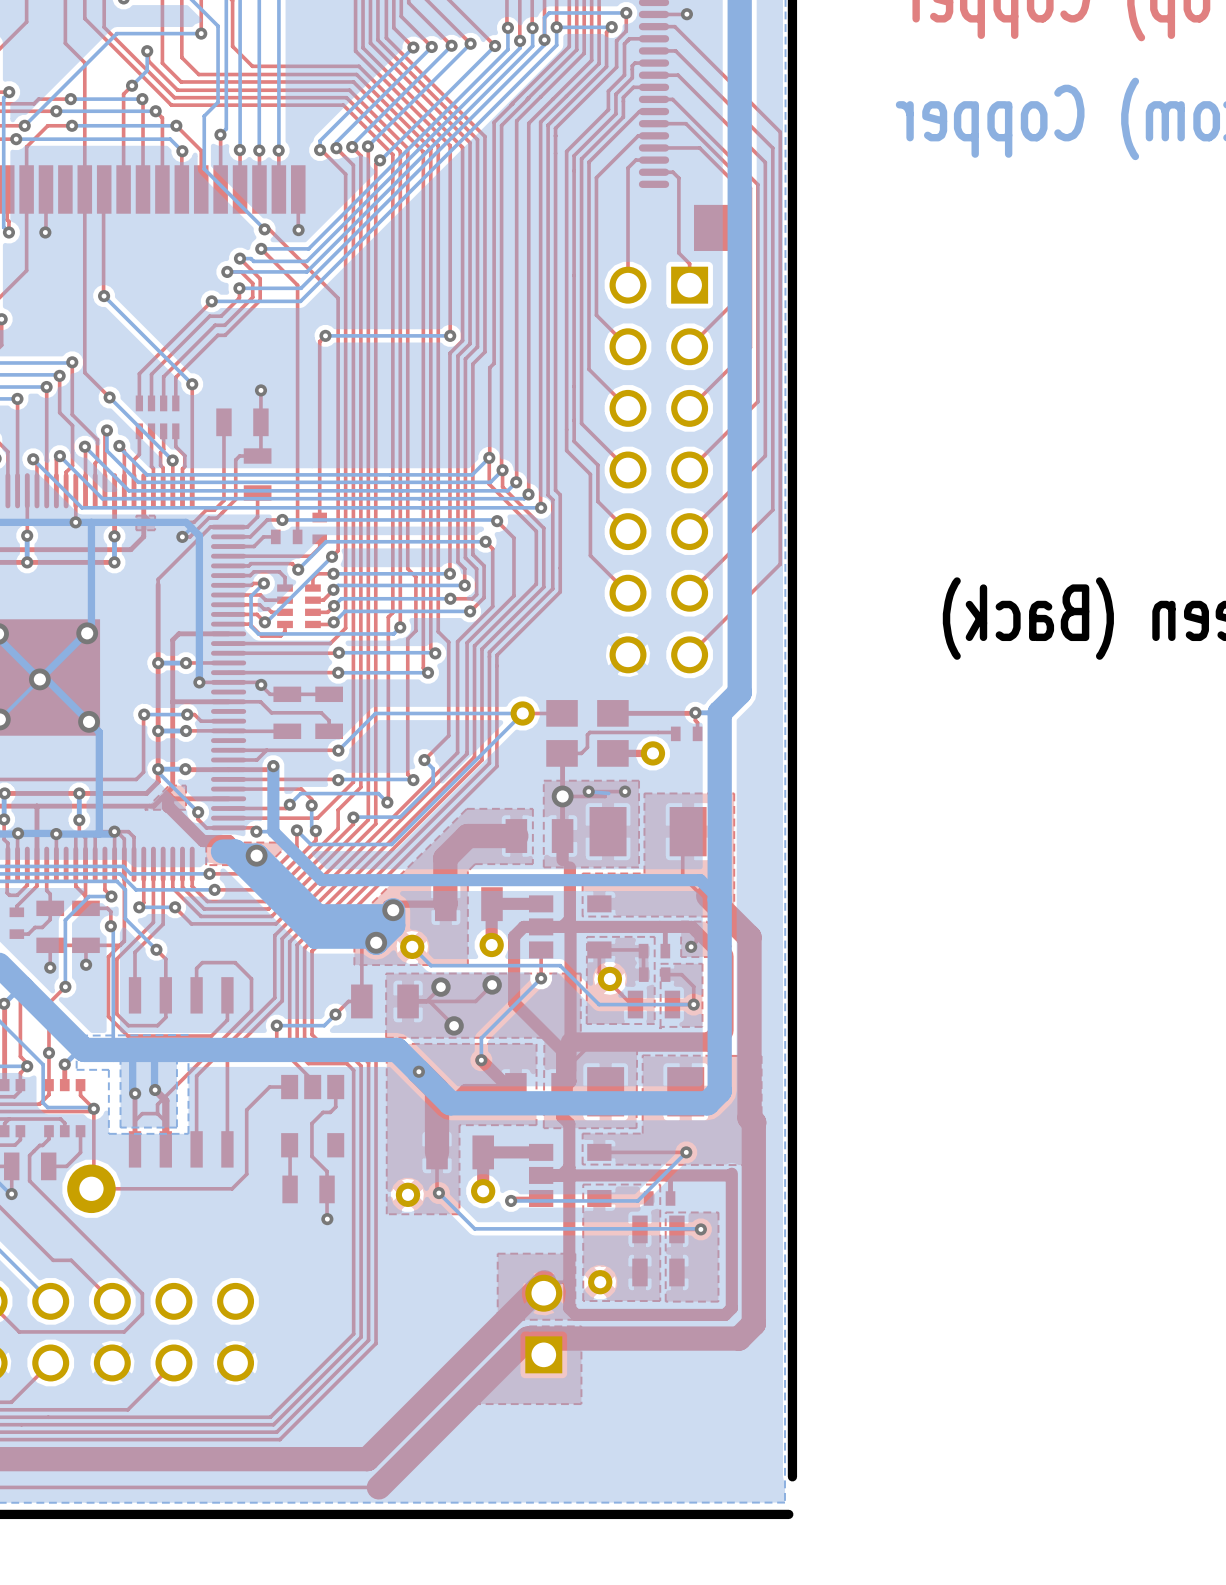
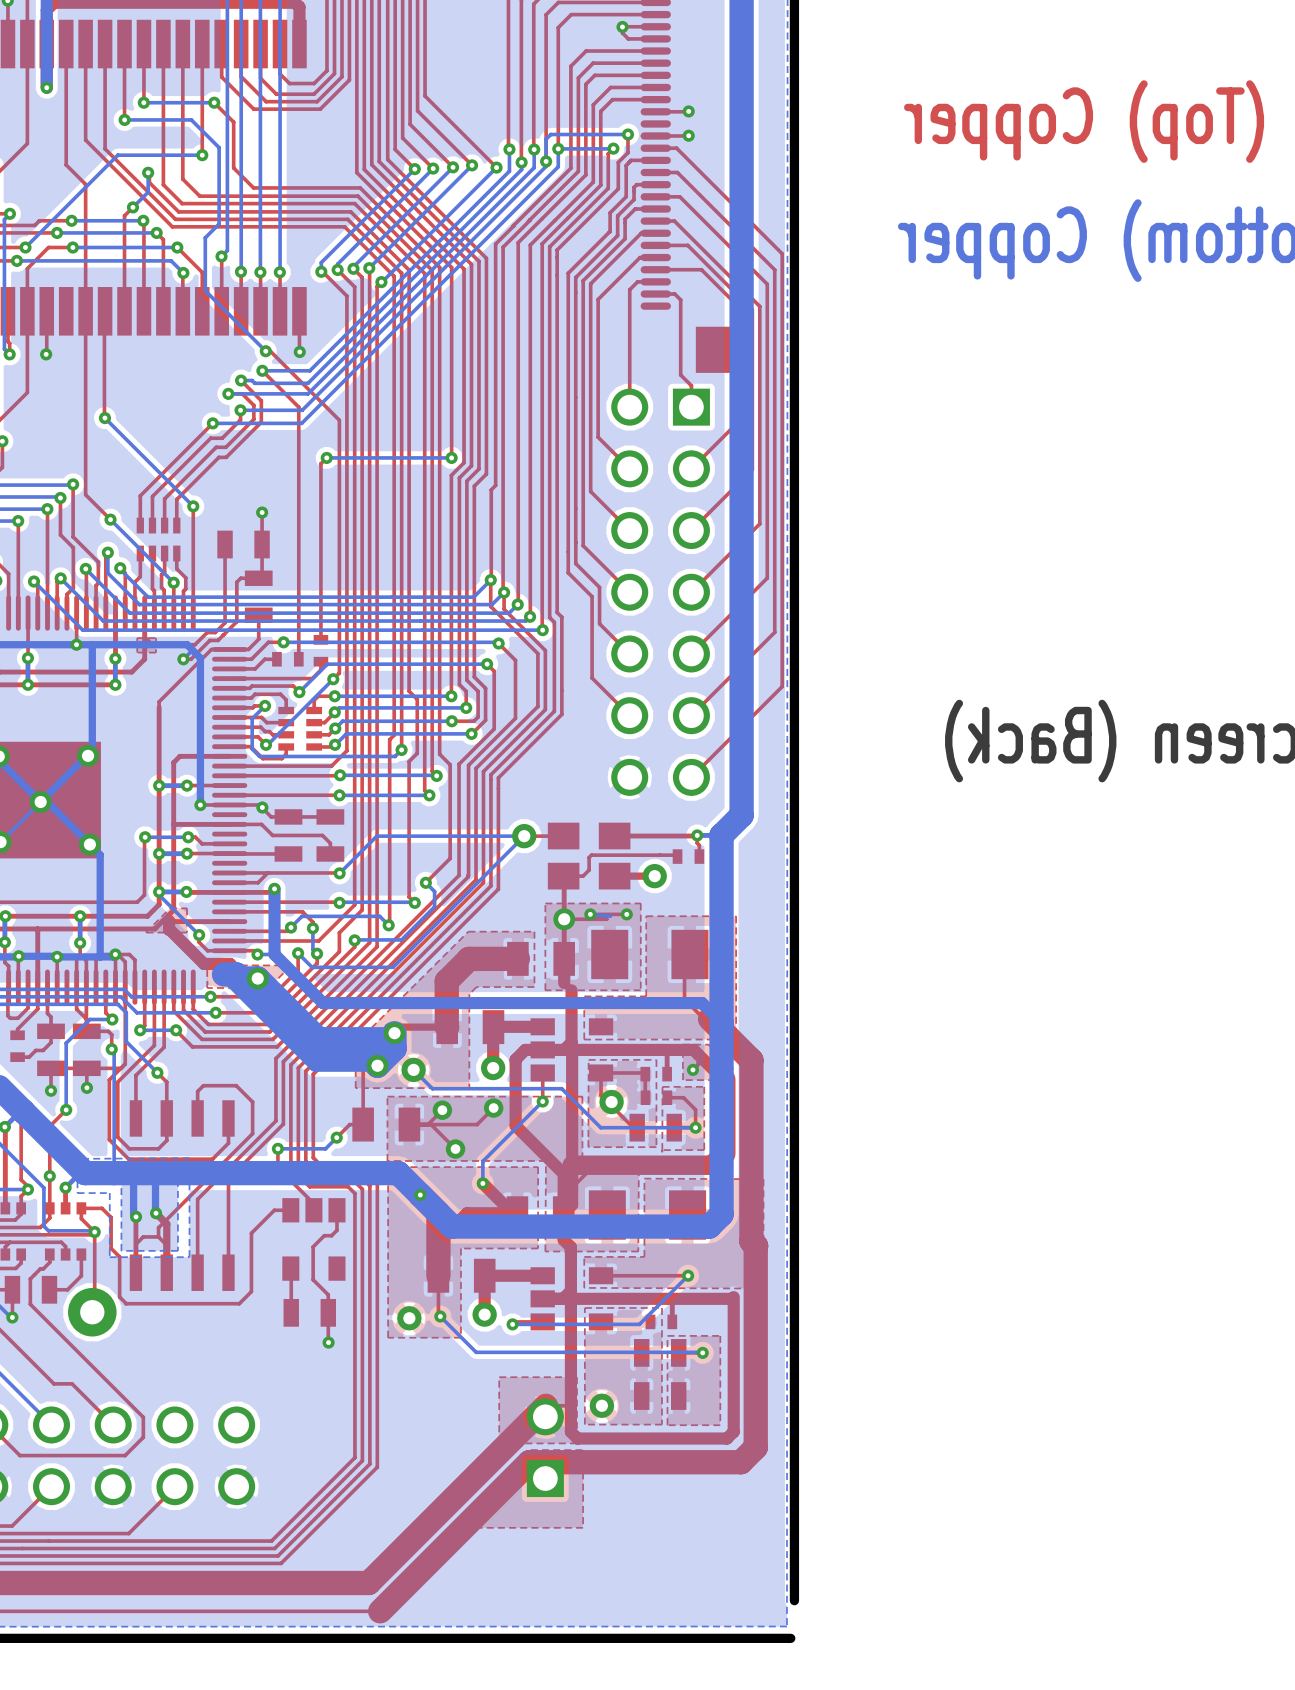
top track: none -> (81, 1208) (101, 1208) (111, 1217) (111, 1248) (119, 1256) (119, 1297) (126, 1303)
top track: (273, 1087) (269, 1087) (246, 1110) (246, 1174) (232, 1188) (91, 1188) -> (274, 1210) (251, 1233) (251, 1291) (239, 1303) (125, 1303)

